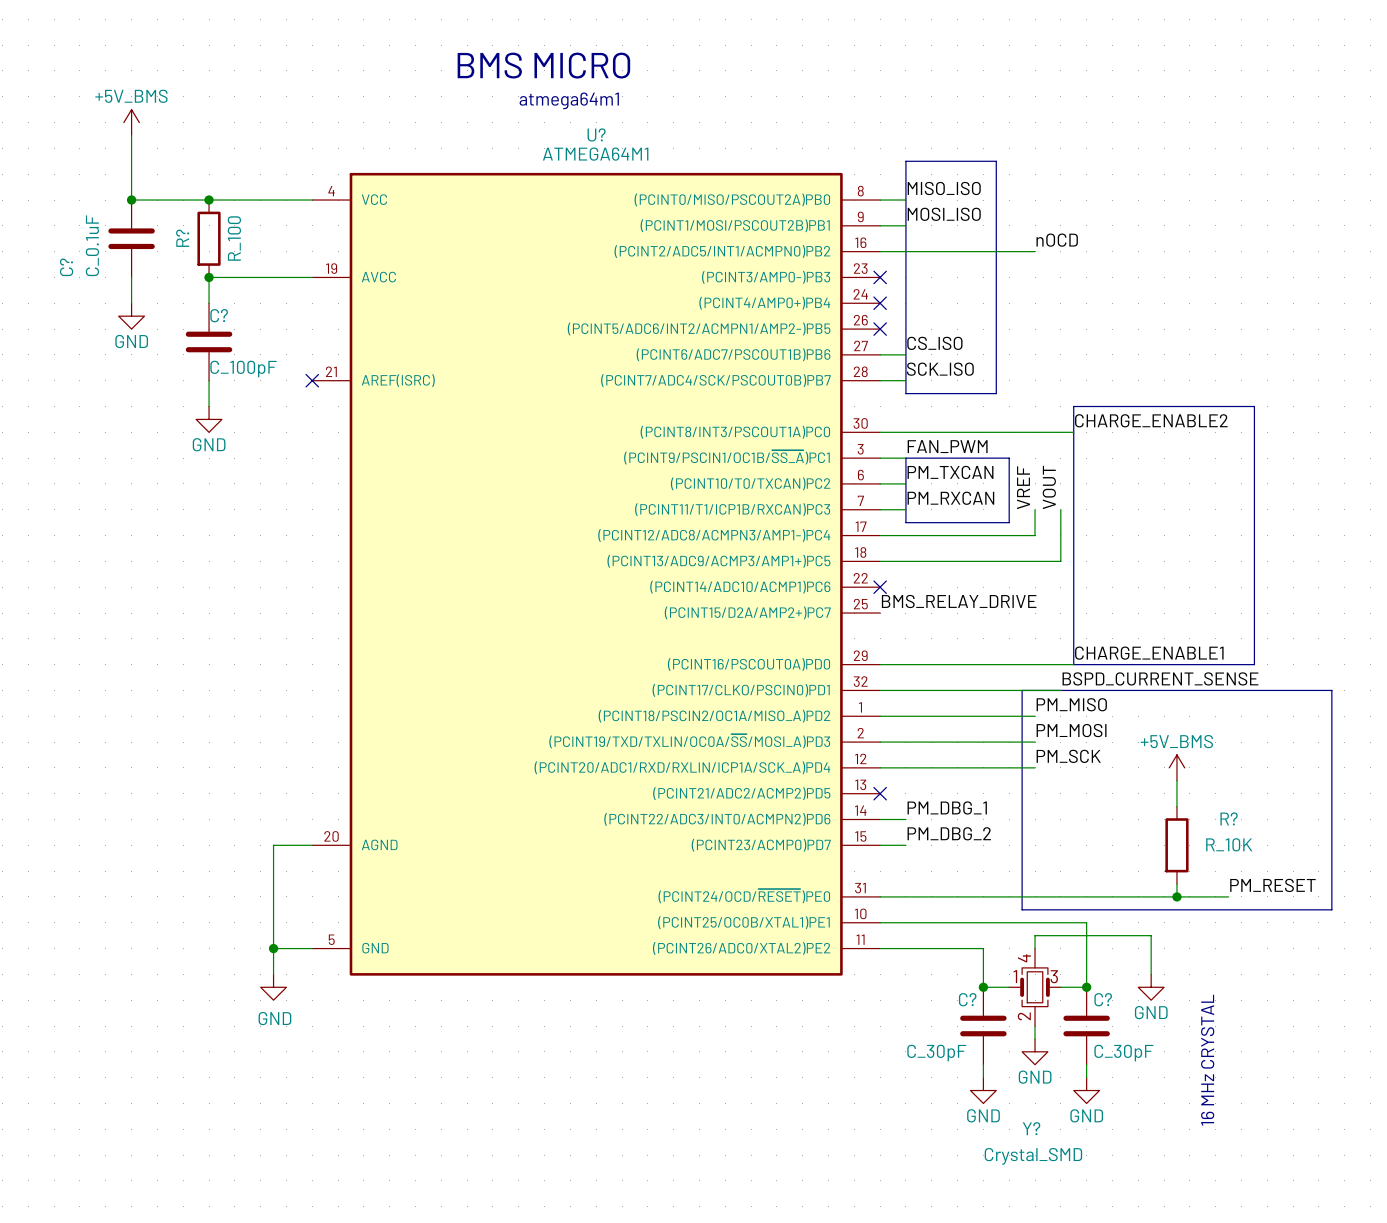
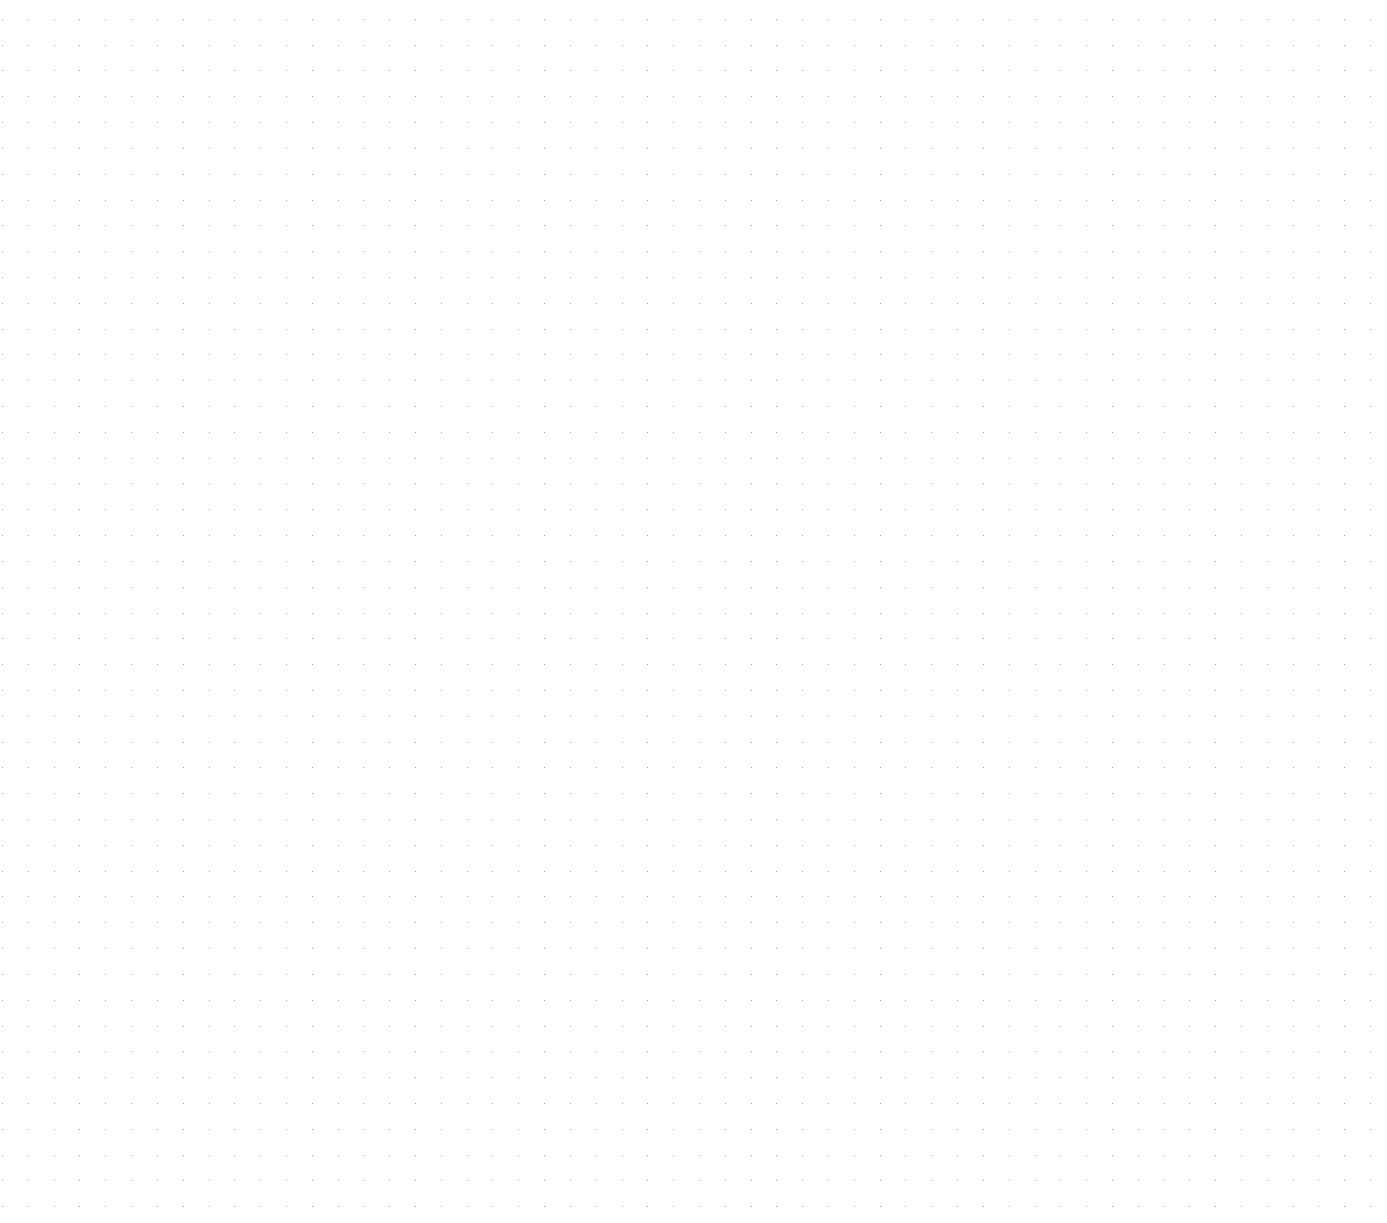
text: BMS MICRO (543, 65) -> none
text: atmega64m1 (569, 100) -> none
power symbol: +5V_BMS (131, 122) -> none
wire: (131, 135) (131, 200) (312, 200) -> none
line: (905, 161) (905, 393) (996, 393) (996, 161) (905, 161) -> none
label: MISO_ISO (944, 188) -> none
junction: (131, 200) -> none
junction: (209, 200) -> none
wire: (880, 200) (905, 200) -> none
label: MOSI_ISO (944, 214) -> none
wire: (880, 225) (905, 225) -> none
C?: C_0.1uF (131, 238) -> none
R?: R_100 (209, 238) -> none
label: nOCD (1057, 240) -> none
wire: (880, 251) (1035, 251) -> none
wire: (131, 277) (131, 303) -> none
junction: (209, 277) -> none
wire: (312, 277) (209, 277) (209, 303) -> none
no-connect mark: (880, 277) -> none
no-connect mark: (880, 303) -> none
power symbol: GND (131, 316) -> none
no-connect mark: (880, 329) -> none
C?: C_100pF (209, 341) -> none
label: CS_ISO (934, 343) -> none
wire: (880, 354) (905, 354) -> none
label: SCK_ISO (940, 369) -> none
wire: (209, 380) (209, 406) -> none
no-connect mark: (312, 380) -> none
wire: (880, 380) (905, 380) -> none
line: (1073, 406) (1254, 406) (1254, 664) (1073, 664) (1073, 406) -> none
power symbol: GND (209, 419) -> none
label: CHARGE_ENABLE2 (1151, 420) -> none
wire: (880, 432) (1073, 432) -> none
label: FAN_PWM (947, 446) -> none
wire: (880, 458) (905, 458) -> none
line: (905, 458) (905, 522) (1009, 522) (1009, 458) (905, 458) -> none
label: PM_TXCAN (950, 472) -> none
wire: (880, 483) (905, 483) -> none
label: VREF (1023, 487) -> none
label: VOUT (1049, 487) -> none
label: PM_RXCAN (950, 498) -> none
wire: (880, 509) (905, 509) -> none
wire: (1035, 509) (1035, 535) (880, 535) -> none
wire: (1060, 509) (1060, 561) (880, 561) -> none
U?: ATMEGA64M1 (596, 574) -> none
no-connect mark: (880, 587) -> none
label: BMS_RELAY_DRIVE (959, 601) -> none
label: CHARGE_ENABLE1 (1149, 653) -> none
wire: (880, 664) (1073, 664) -> none
label: BSPD_CURRENT_SENSE (1160, 678) -> none
wire: (880, 690) (1060, 690) -> none
line: (1022, 690) (1022, 909) (1331, 909) (1331, 690) (1022, 690) -> none
label: PM_MISO (1071, 704) -> none
wire: (880, 716) (1035, 716) -> none
label: PM_MOSI (1071, 730) -> none
wire: (880, 742) (1035, 742) -> none
label: PM_SCK (1068, 756) -> none
wire: (880, 767) (1035, 767) -> none
power symbol: +5V_BMS (1176, 767) -> none
wire: (1176, 780) (1176, 806) -> none
no-connect mark: (880, 793) -> none
label: PM_DBG_1 (947, 807) -> none
wire: (880, 819) (905, 819) -> none
label: PM_DBG_2 (949, 833) -> none
wire: (312, 845) (273, 845) (273, 974) -> none
wire: (880, 845) (905, 845) -> none
R?: R_10K (1176, 845) -> none
wire: (1176, 884) (1176, 896) -> none
label: PM_RESET (1272, 885) -> none
wire: (880, 896) (1228, 896) -> none
junction: (1176, 896) -> none
wire: (880, 922) (1086, 922) (1086, 987) (1060, 987) -> none
wire: (273, 948) (312, 948) -> none
junction: (273, 948) -> none
wire: (880, 948) (983, 948) (983, 987) (1009, 987) -> none
wire: (1035, 948) (1035, 935) (1151, 935) (1151, 974) -> none
power symbol: GND (273, 987) -> none
junction: (983, 987) -> none
Y?: Crystal_SMD (1035, 987) -> none
junction: (1086, 987) -> none
power symbol: GND (1151, 987) -> none
C?: C_30pF (983, 1026) -> none
wire: (1035, 1026) (1035, 1038) -> none
C?: C_30pF (1086, 1026) -> none
power symbol: GND (1035, 1051) -> none
text: 16 MHz CRYSTAL (1207, 1060) -> none
wire: (983, 1064) (983, 1077) -> none
wire: (1086, 1064) (1086, 1077) -> none
power symbol: GND (983, 1090) -> none
power symbol: GND (1086, 1090) -> none

